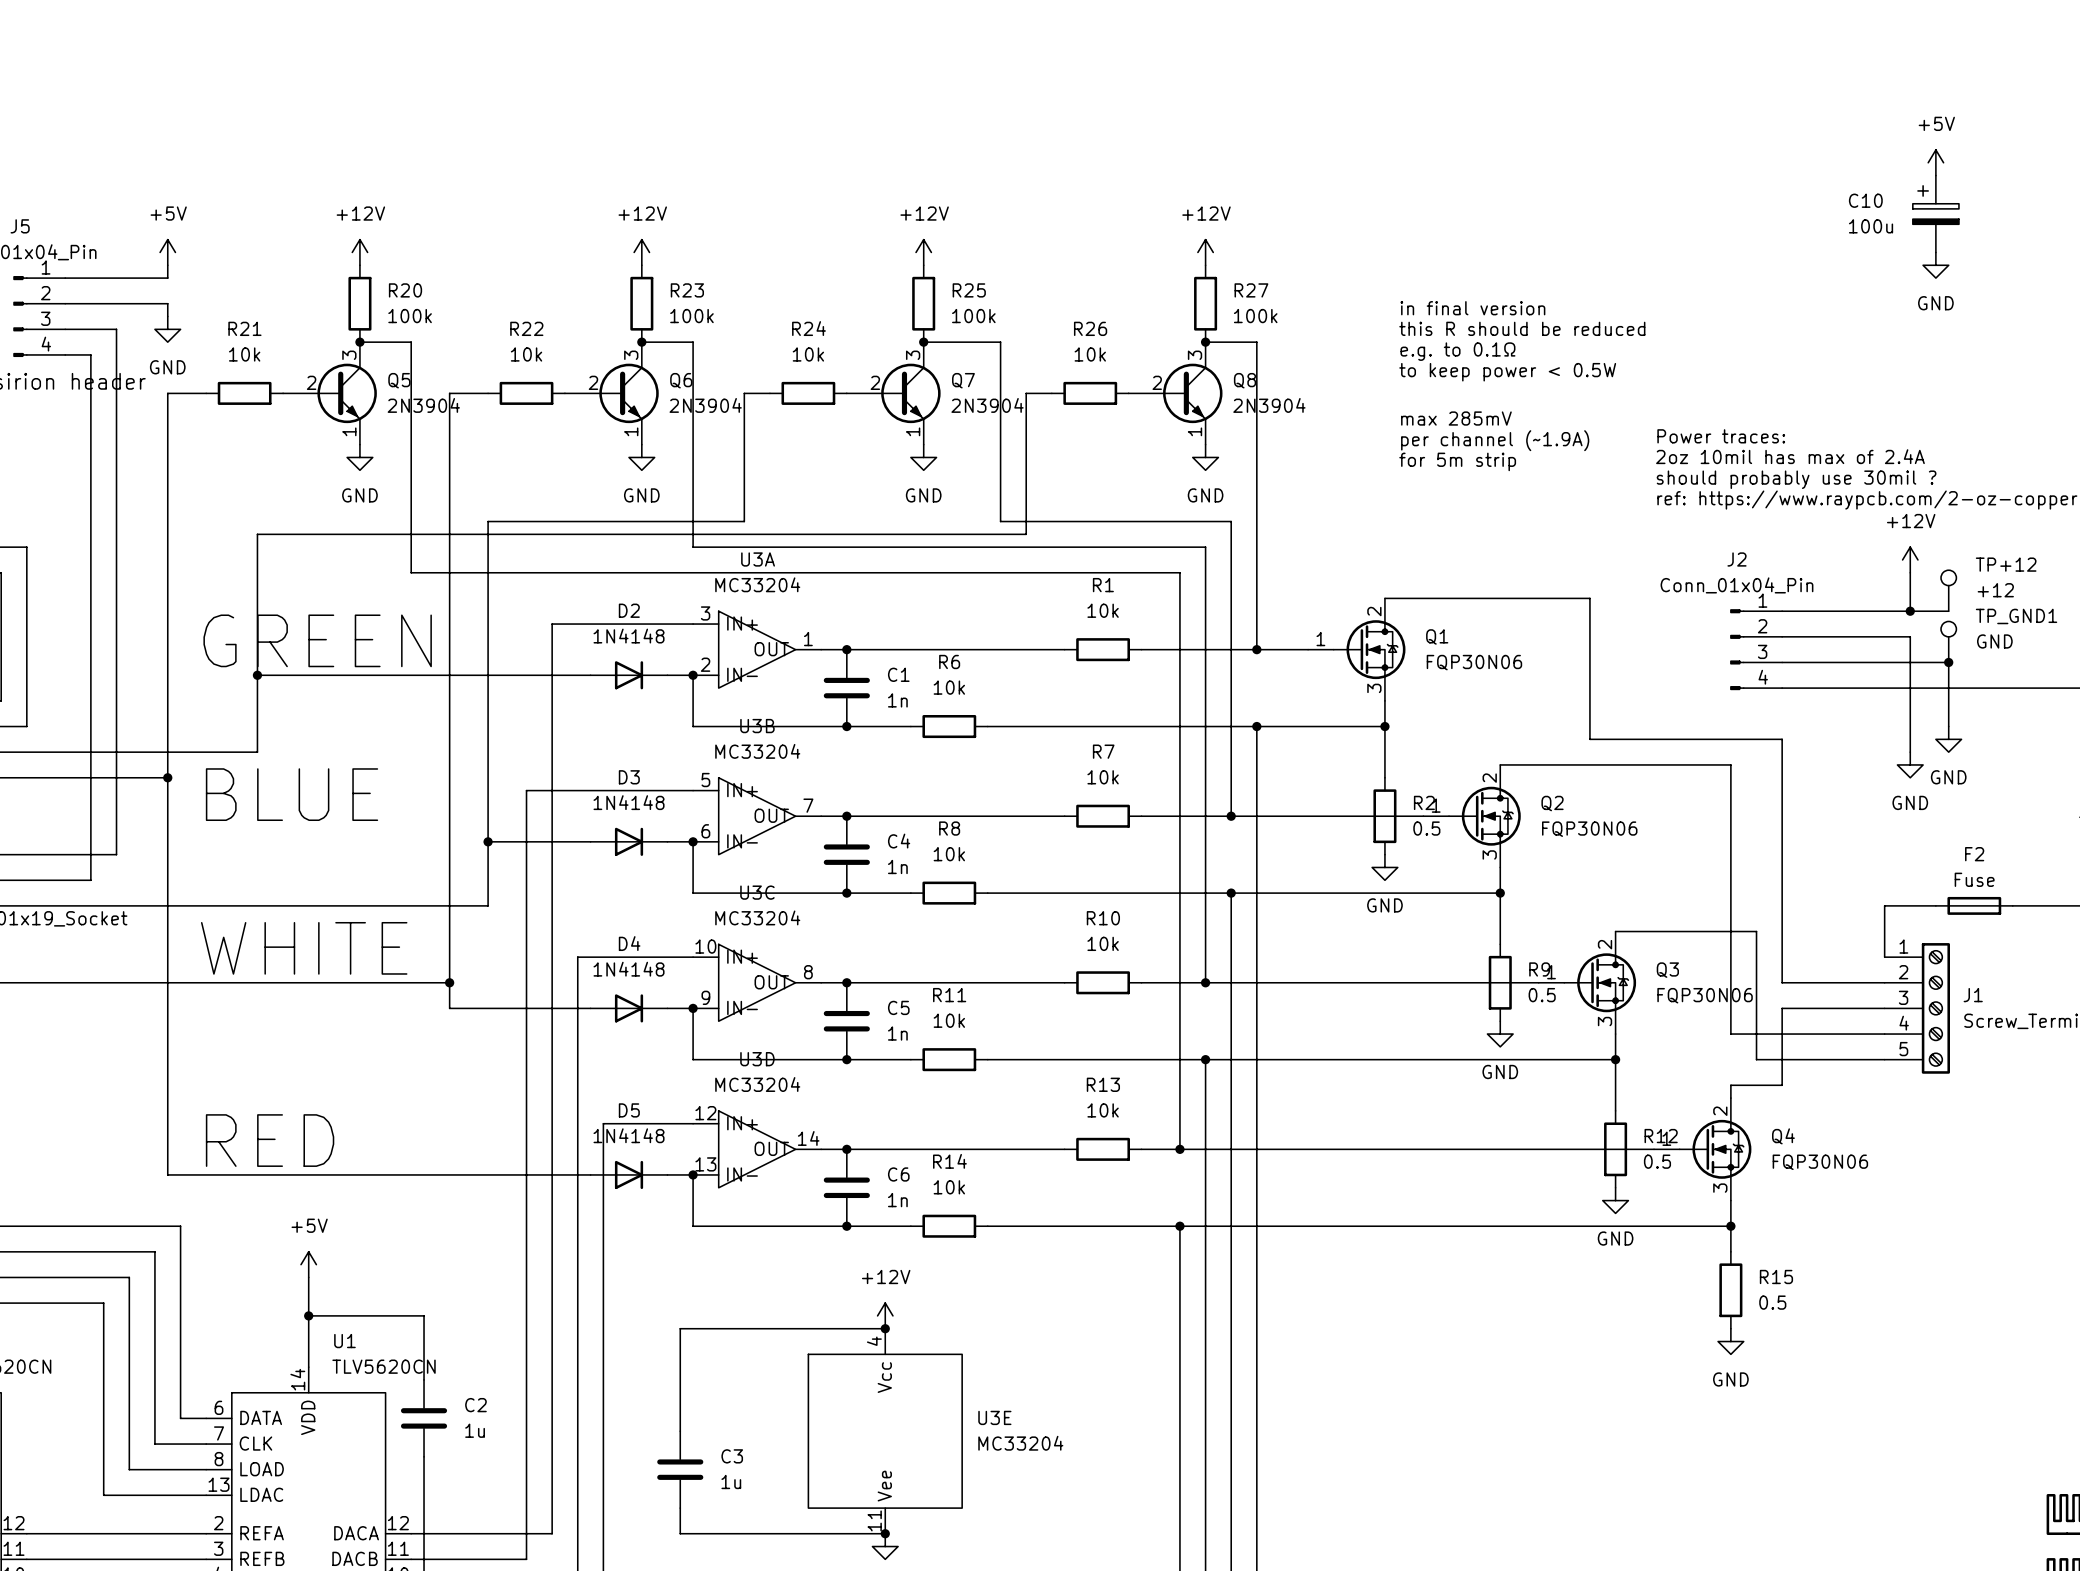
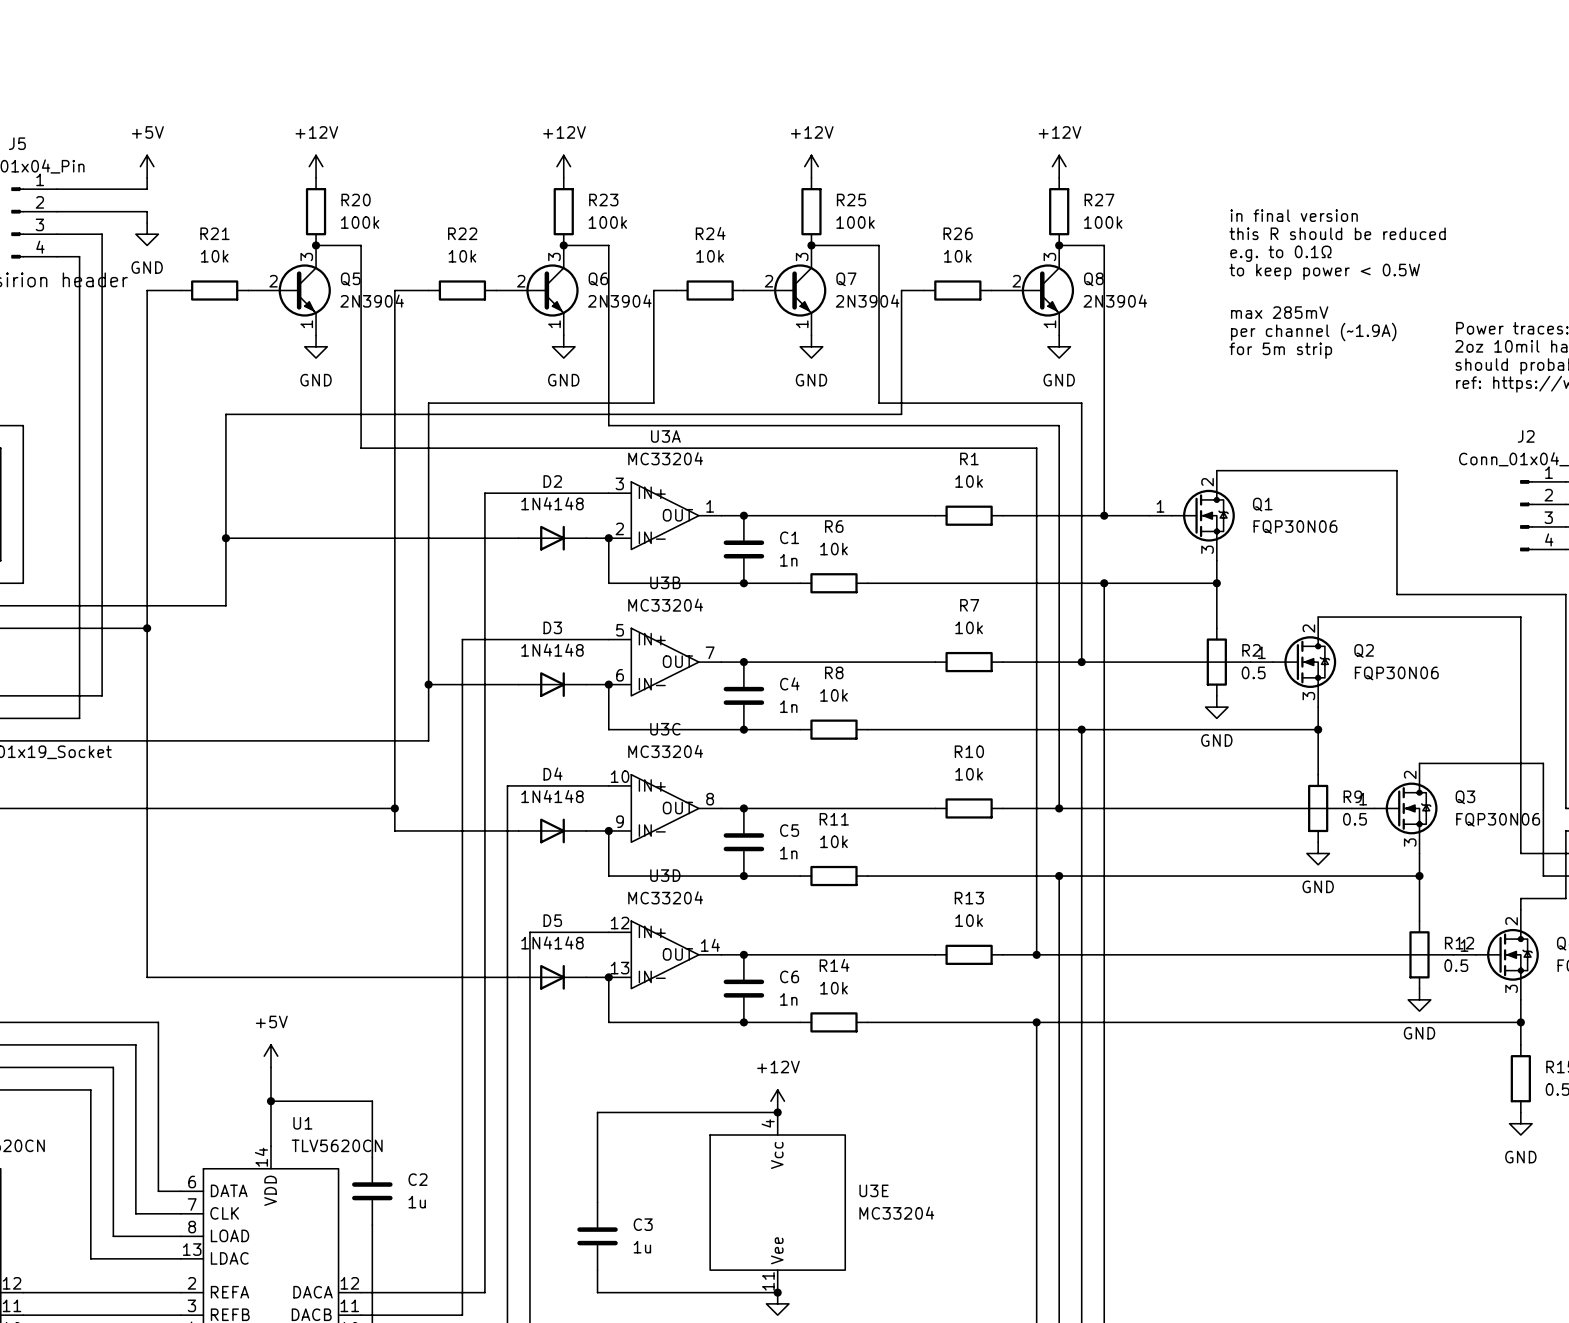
text: GREEN (317, 640) -> none
text: BLUE (292, 794) -> none
text: WHITE (304, 948) -> none
text: RED (270, 1140) -> none

